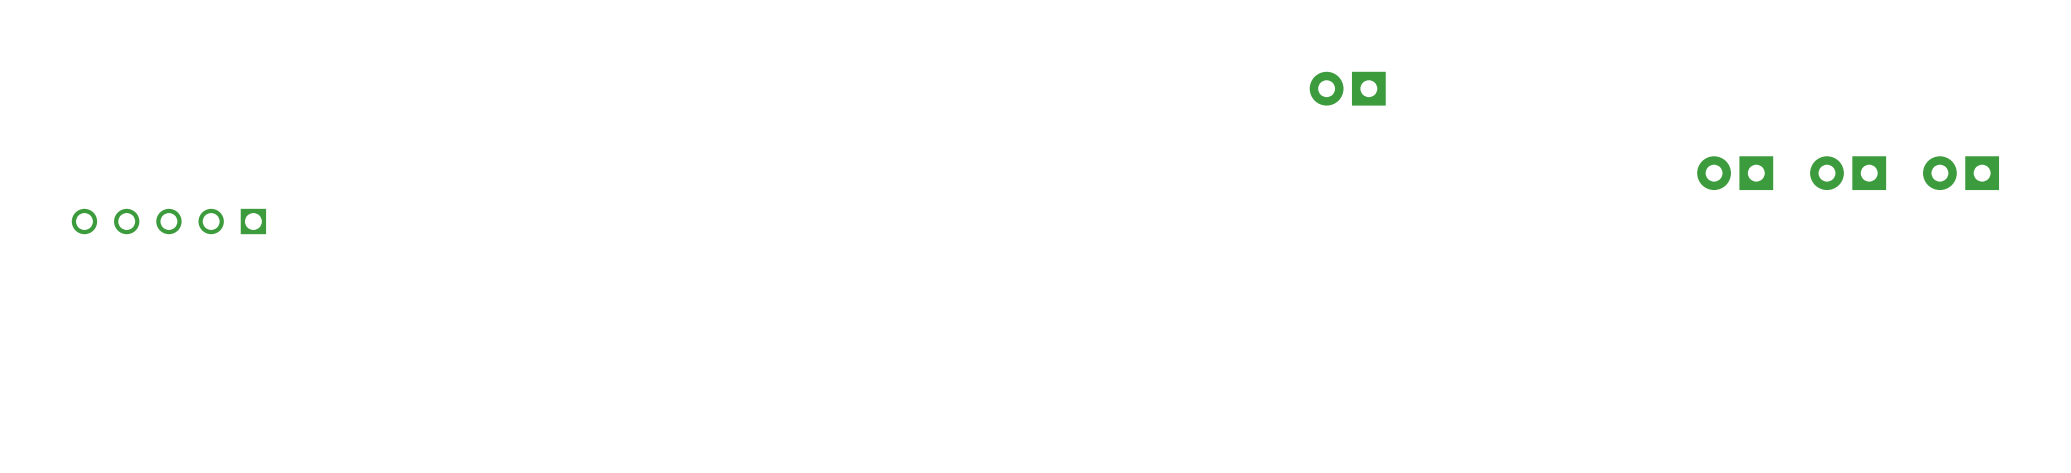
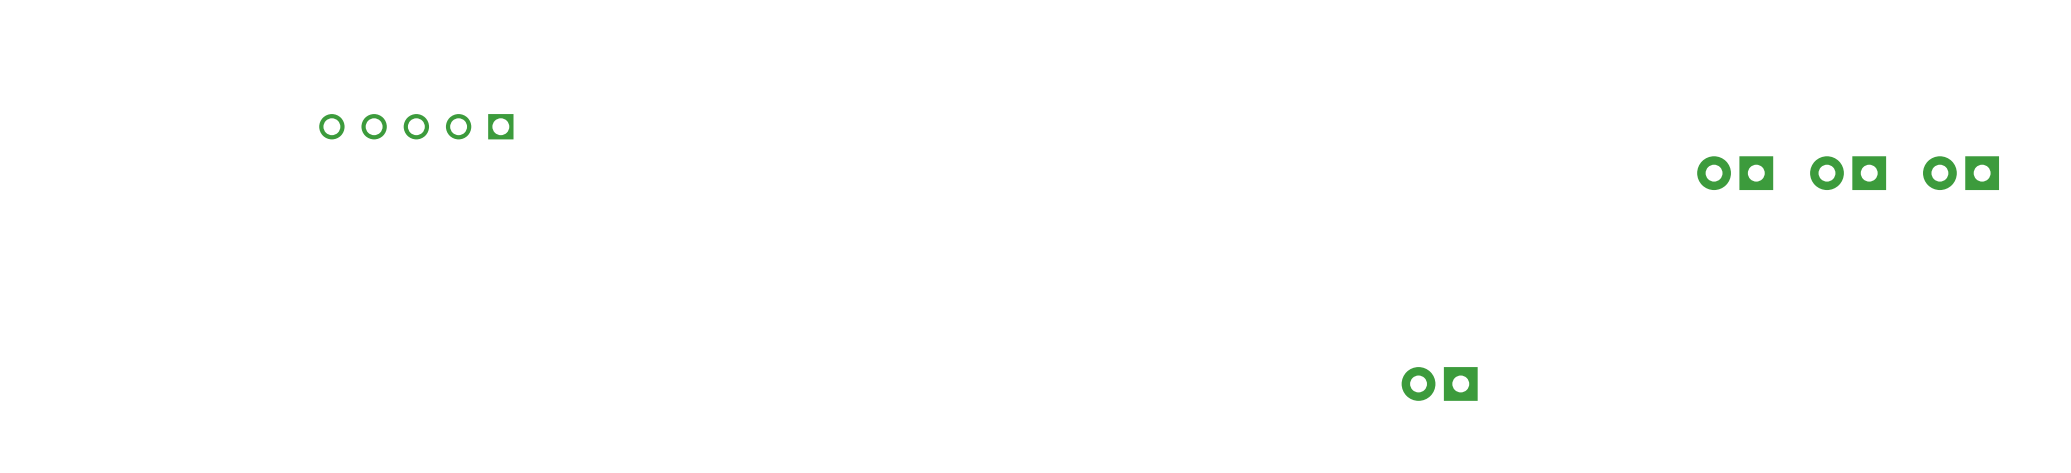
part position: (1347, 88) -> (1439, 383)
part position: (168, 221) -> (416, 126)

